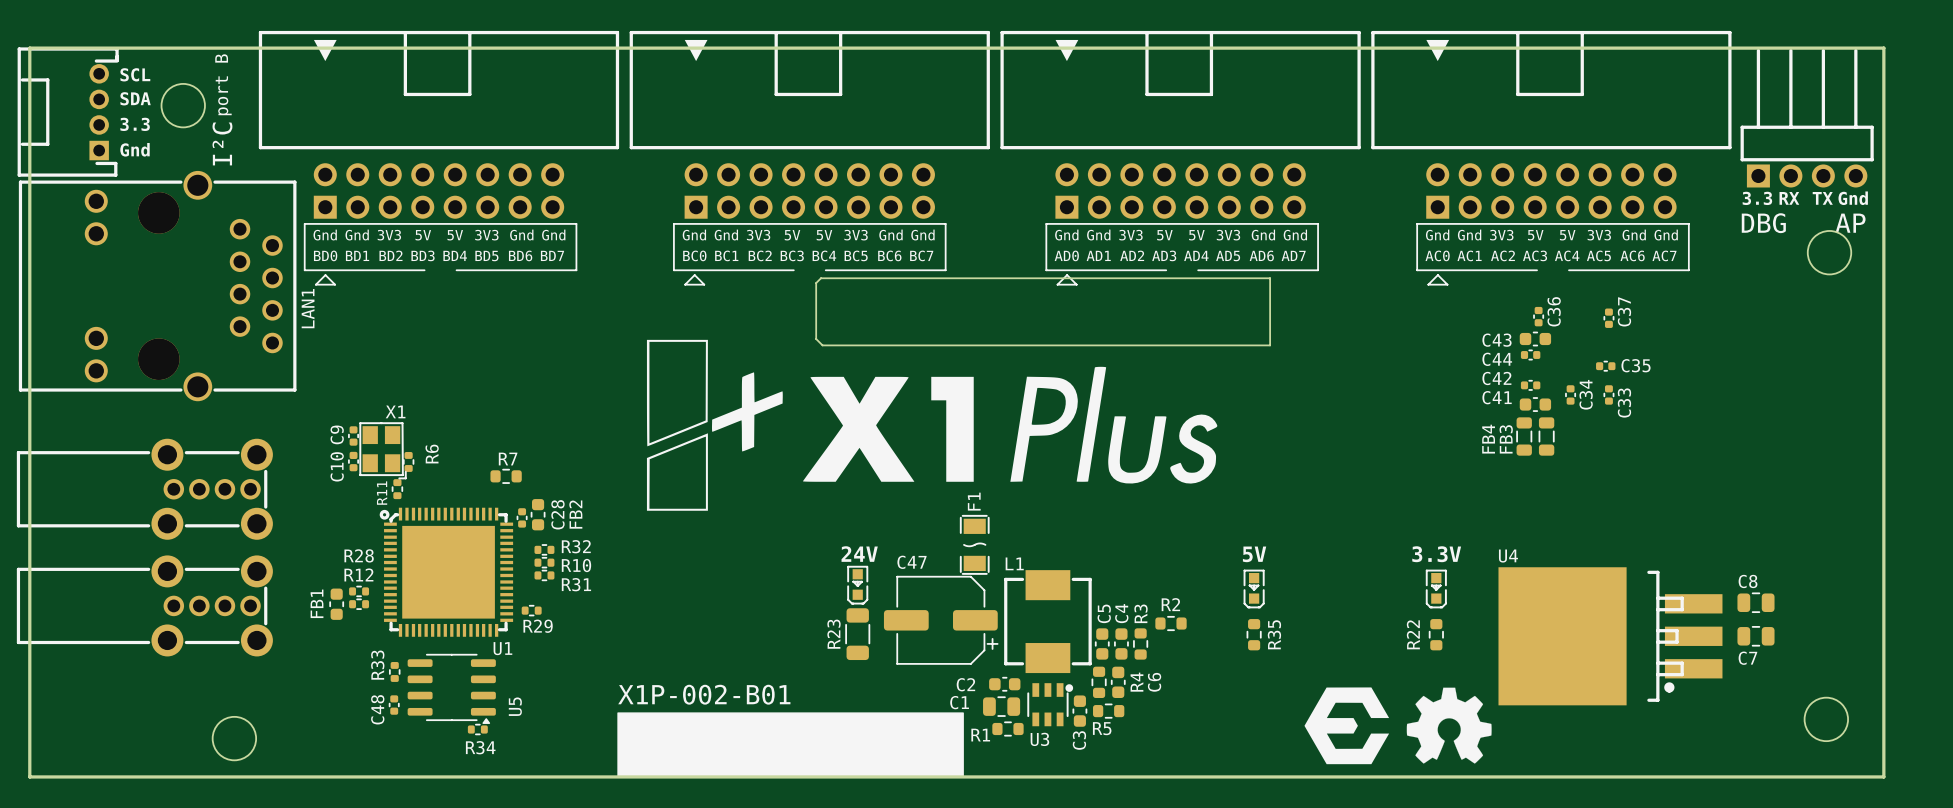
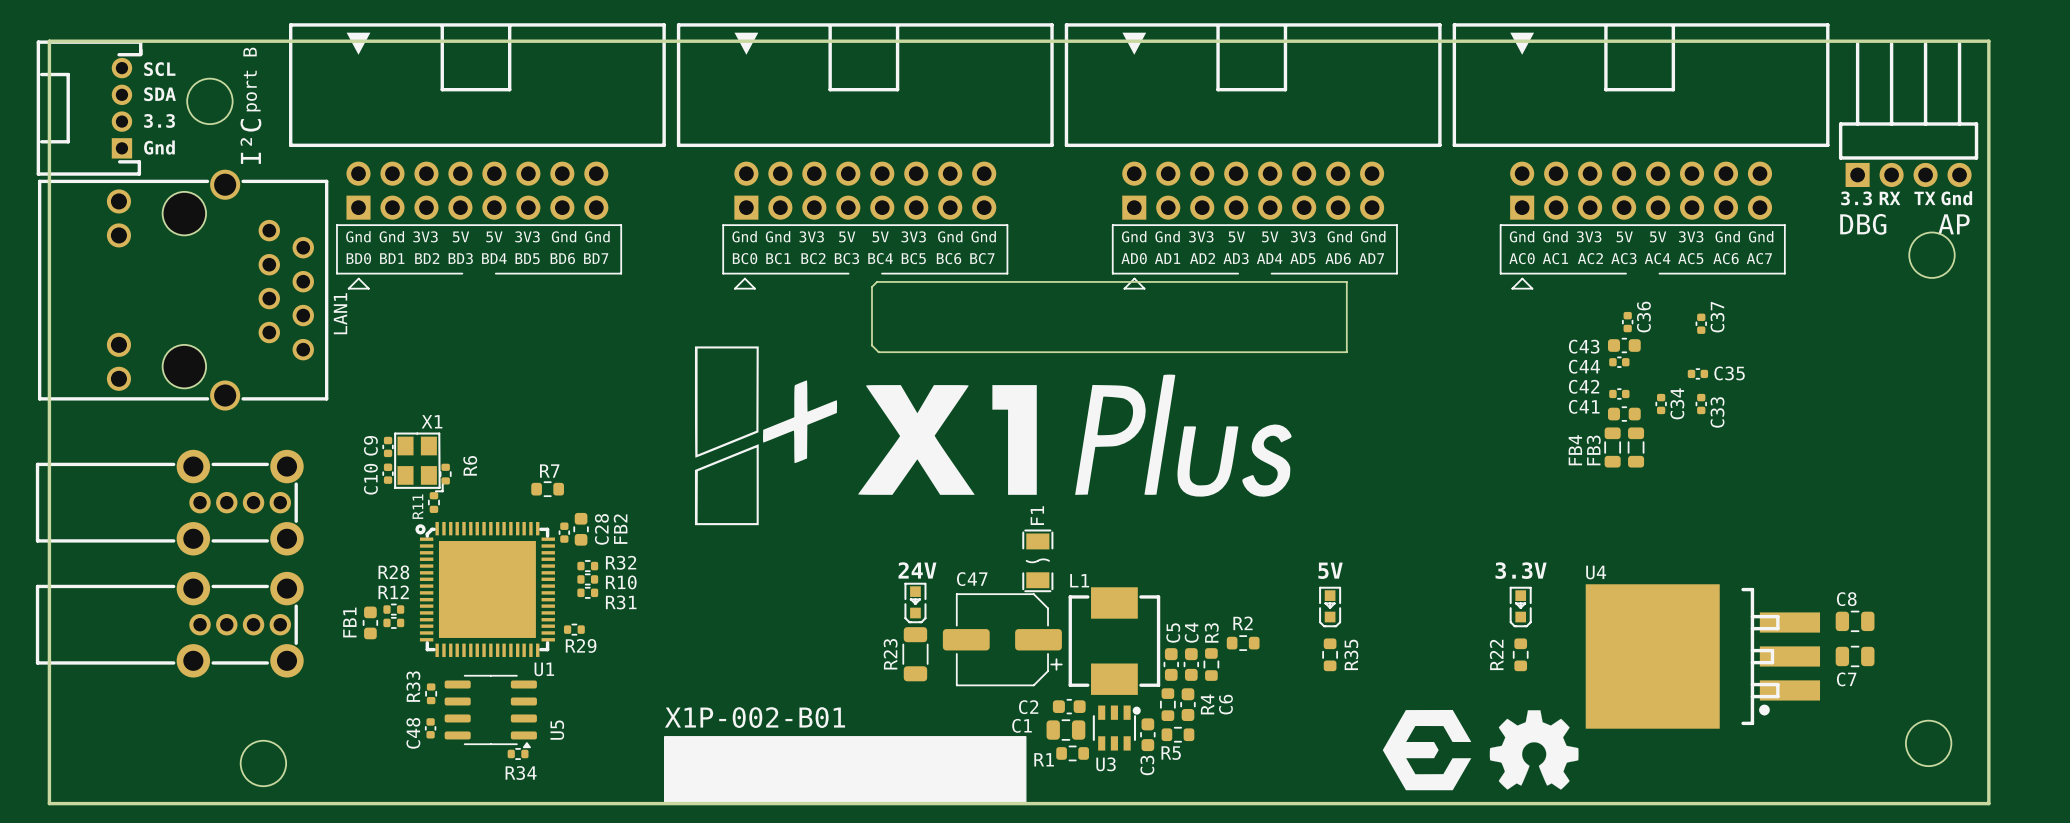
LAN1 footprint: [18, 170, 297, 402] -> [37, 169, 329, 411]

